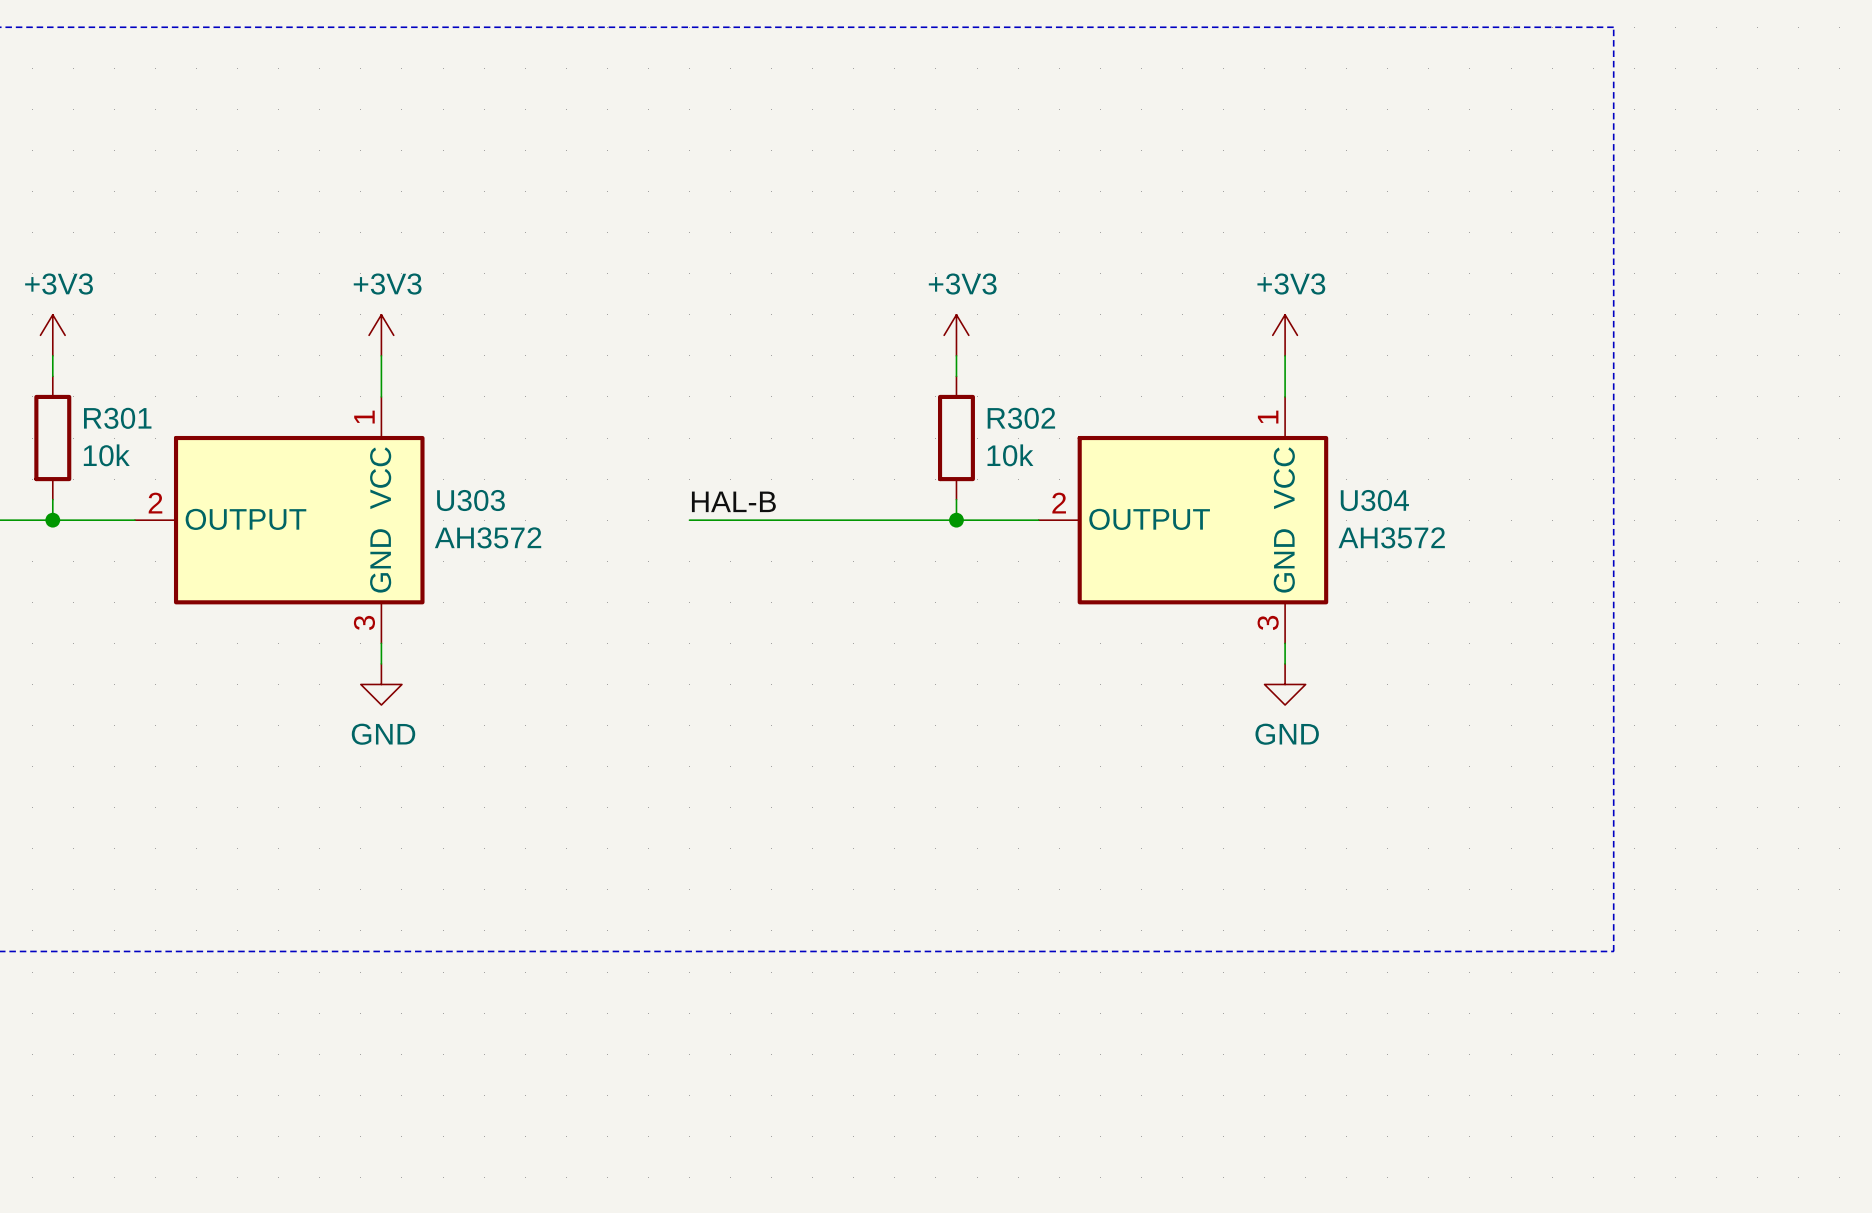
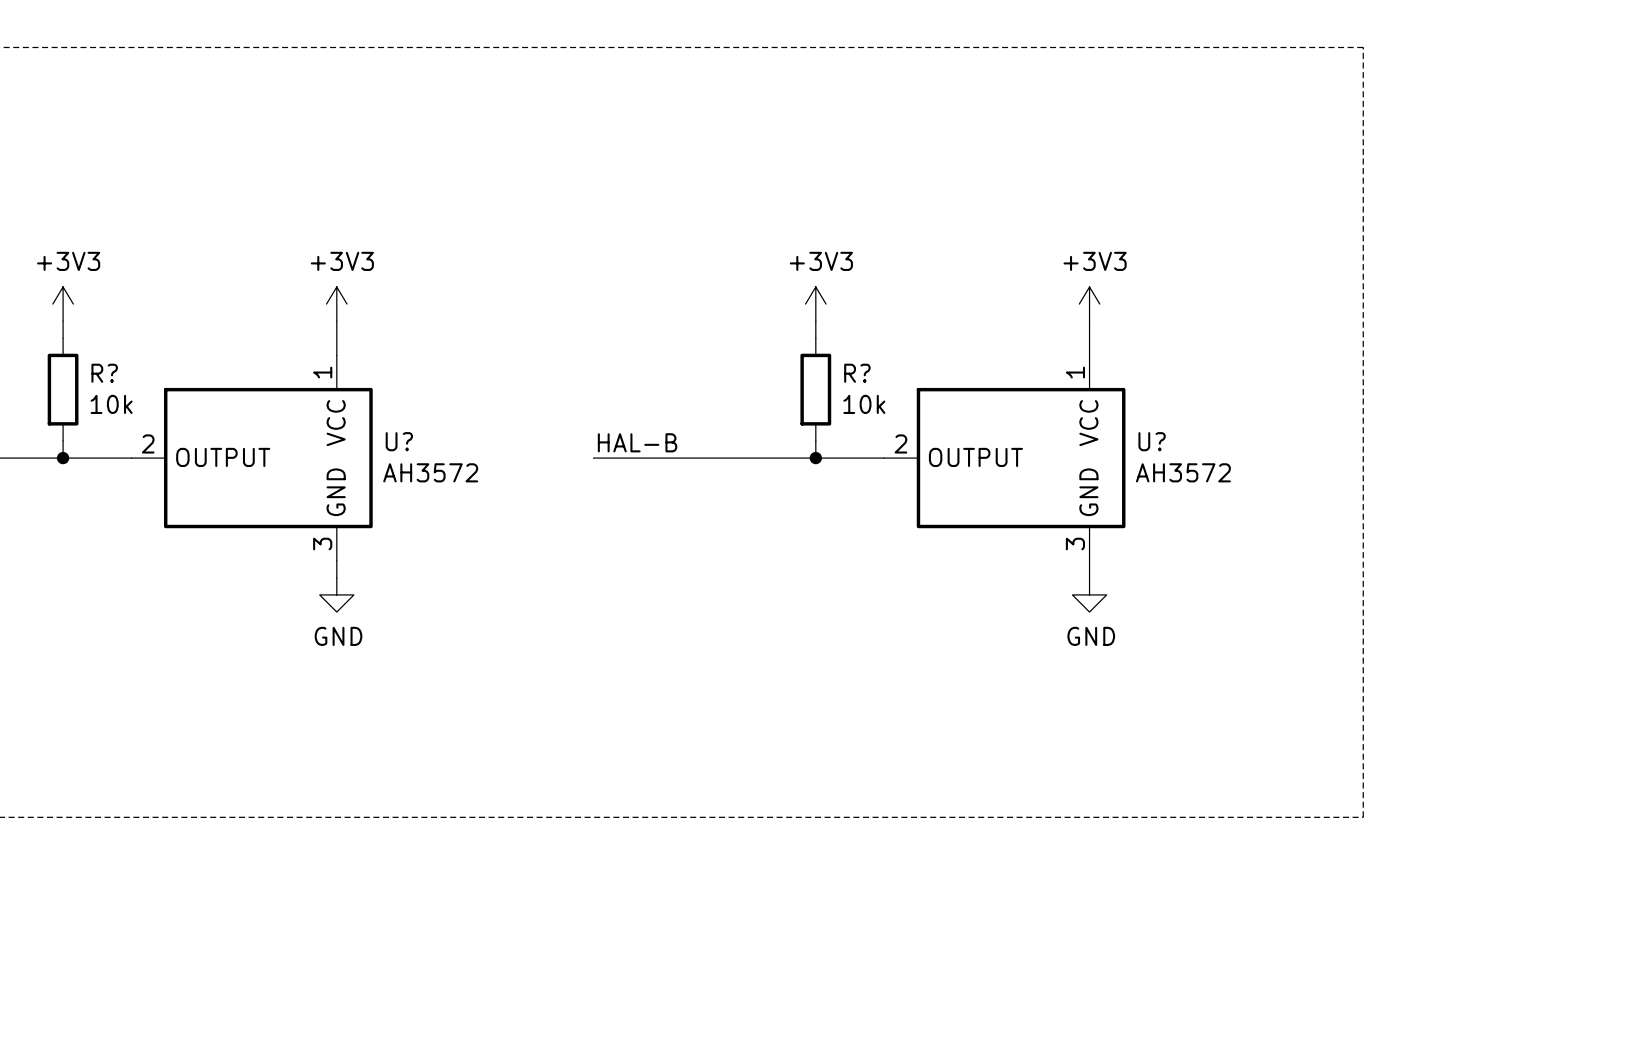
R301 name: R301 (117, 418) -> R? (104, 373)
R302 name: R302 (1021, 418) -> R? (857, 373)
U303 name: U303 (470, 500) -> U? (399, 441)
U304 name: U304 (1374, 500) -> U? (1152, 441)

